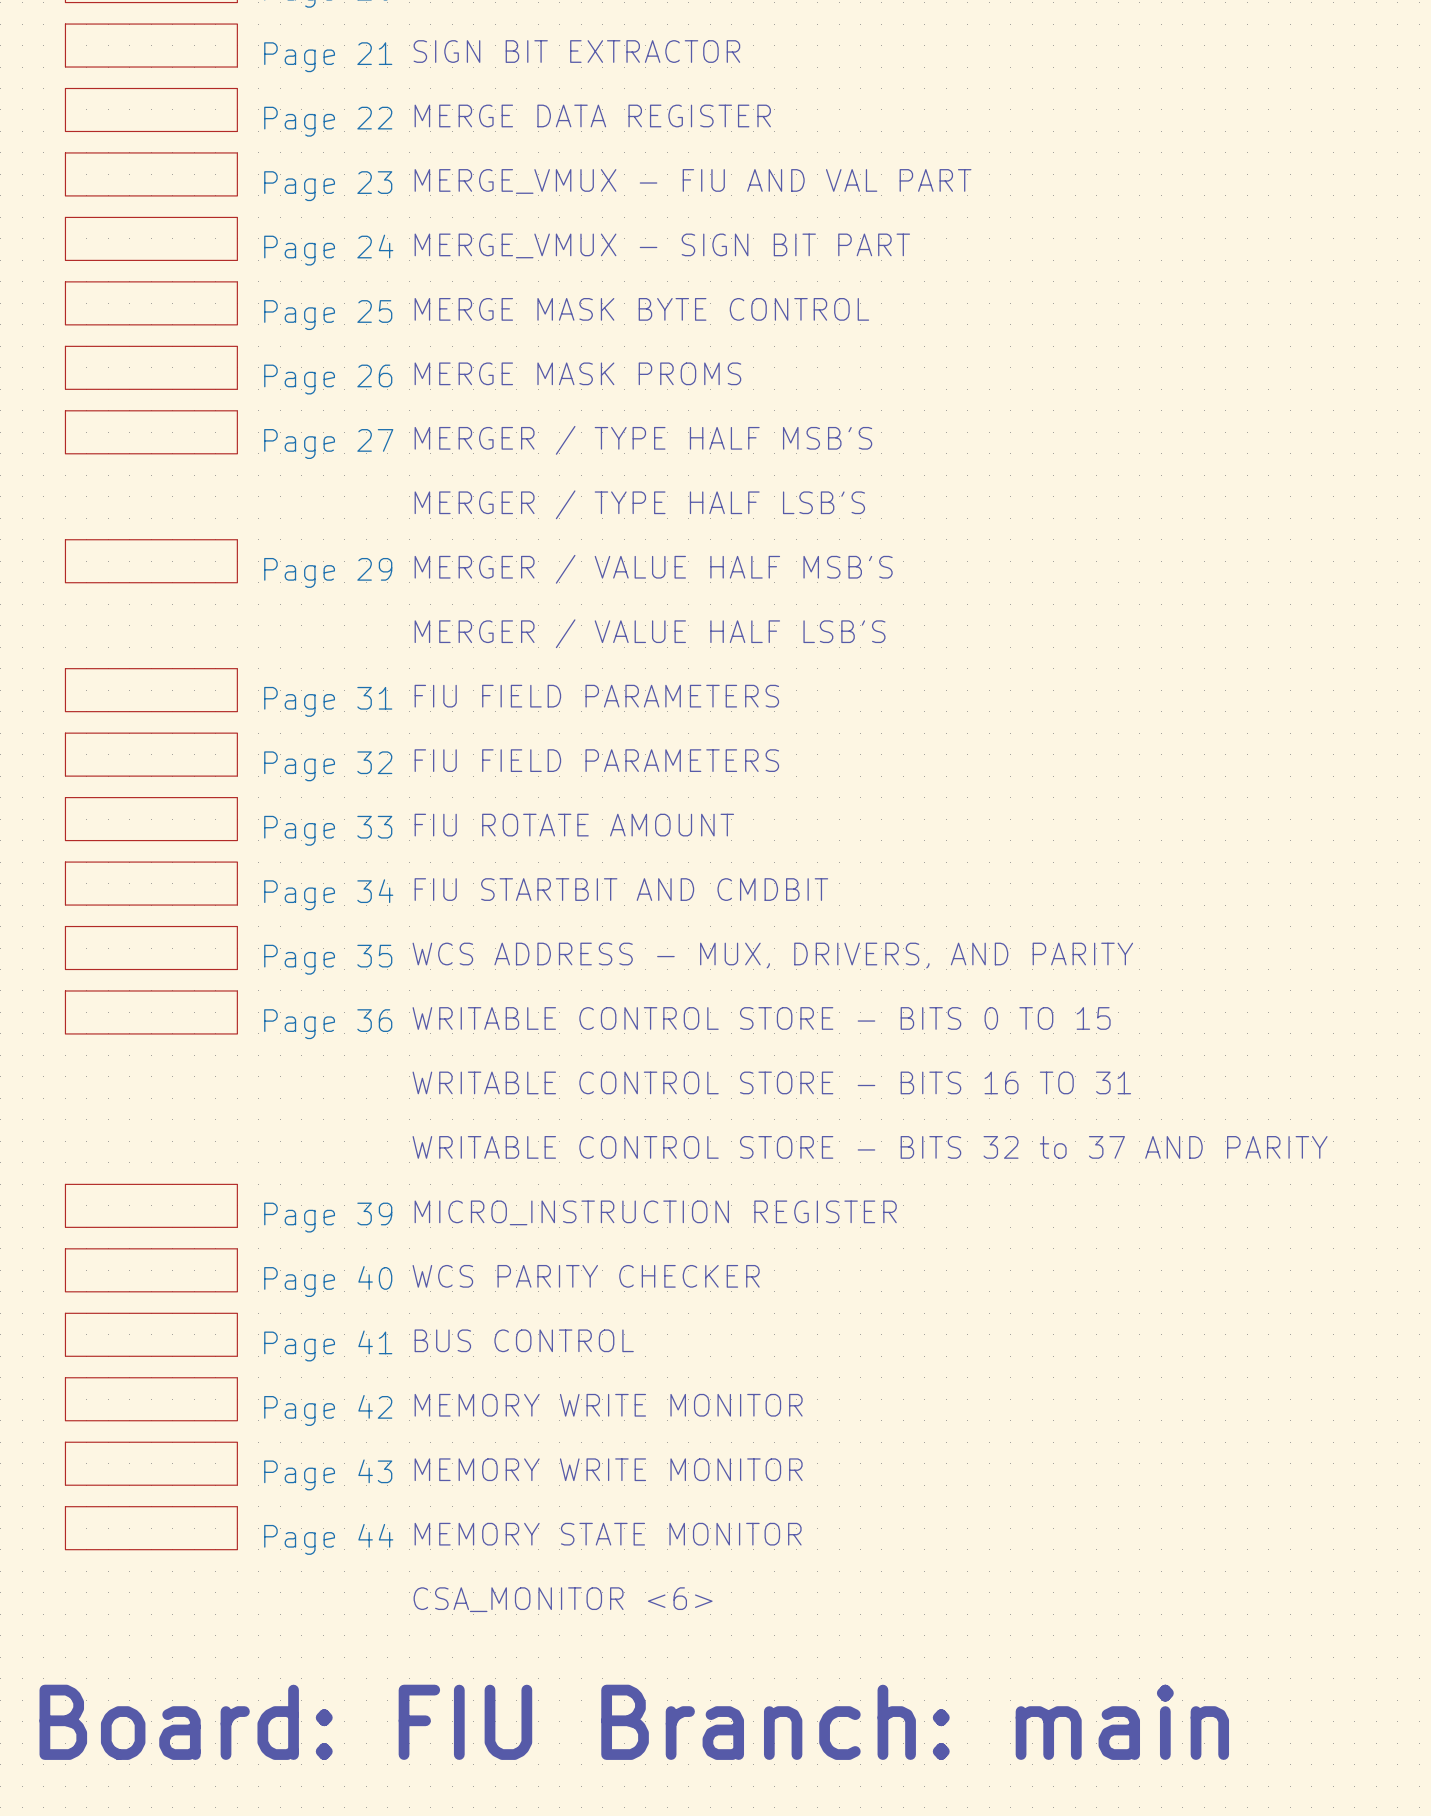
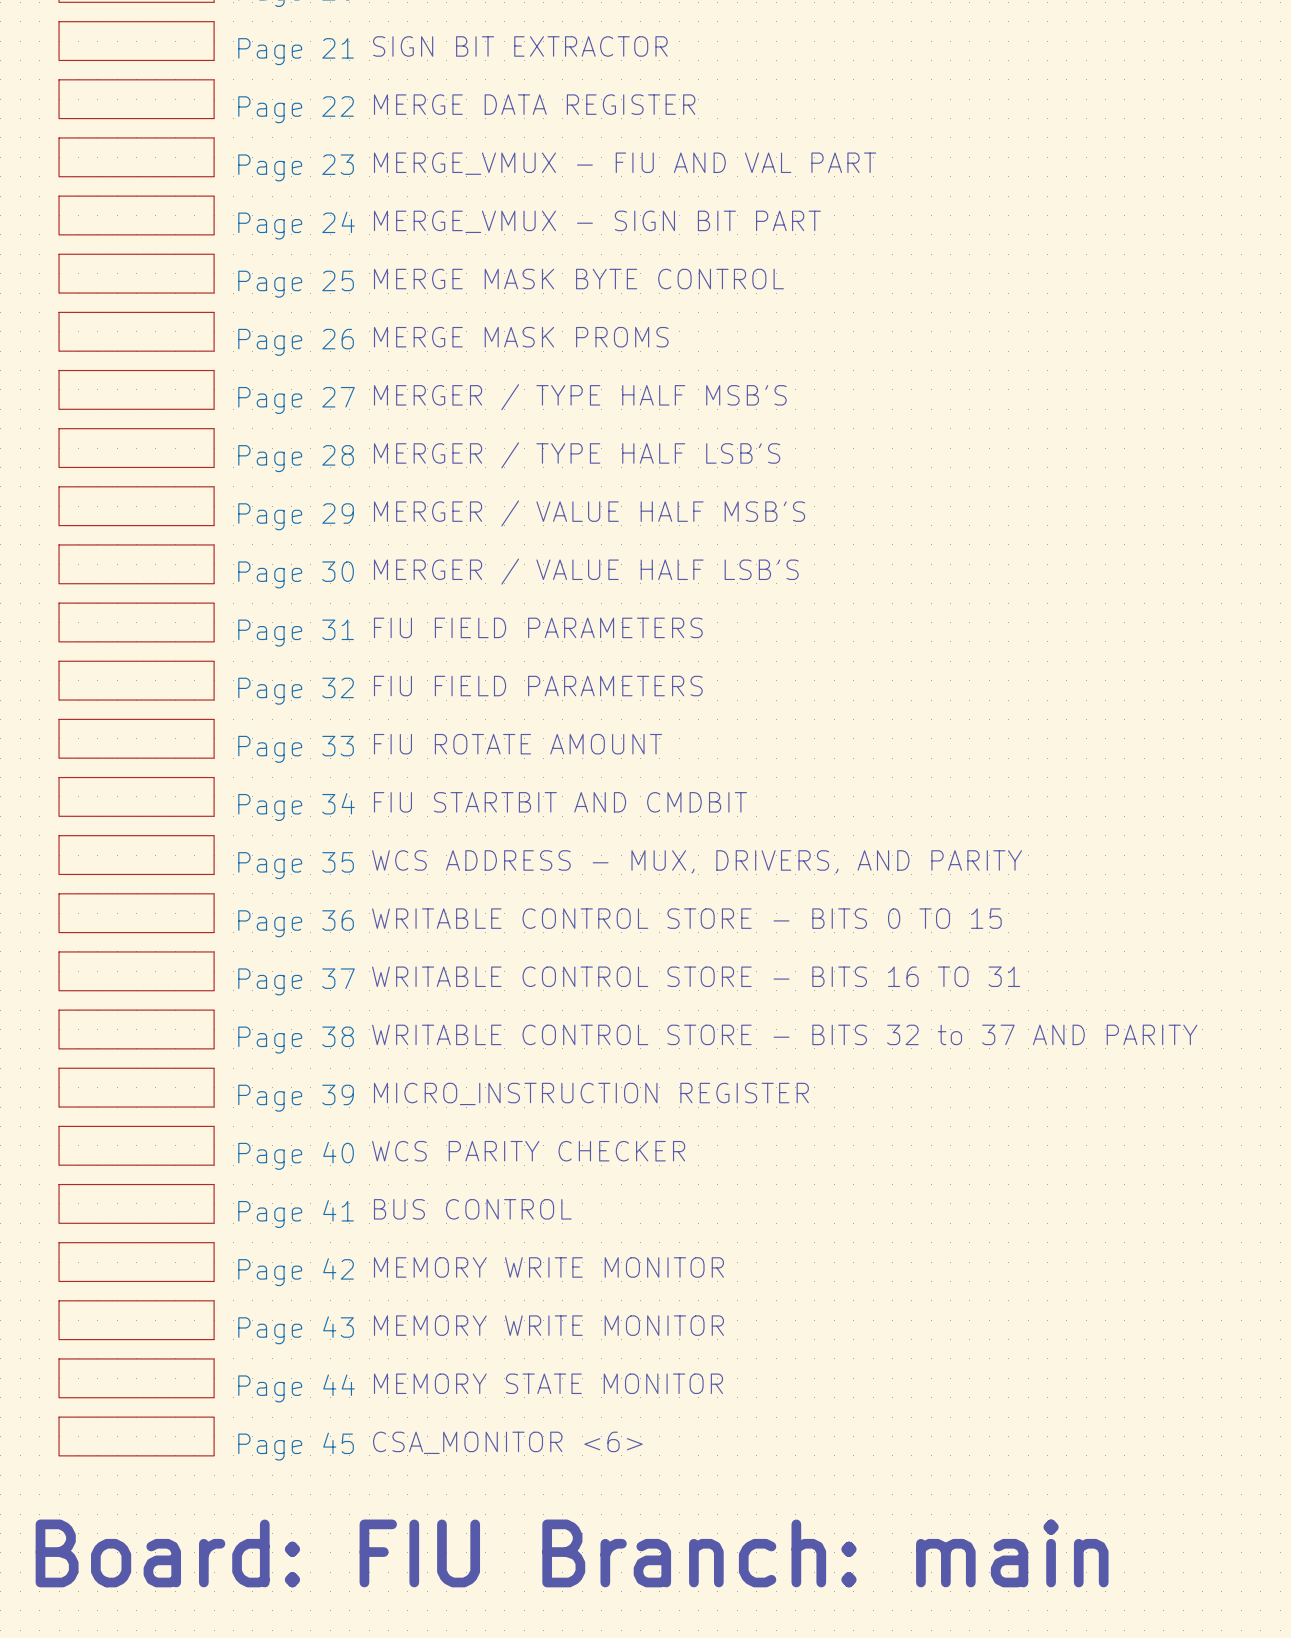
sheet Page 28: none -> (136, 448)
sheet Page 30: none -> (136, 564)
sheet Page 37: none -> (136, 971)
sheet Page 38: none -> (136, 1029)
sheet Page 45: none -> (136, 1436)

